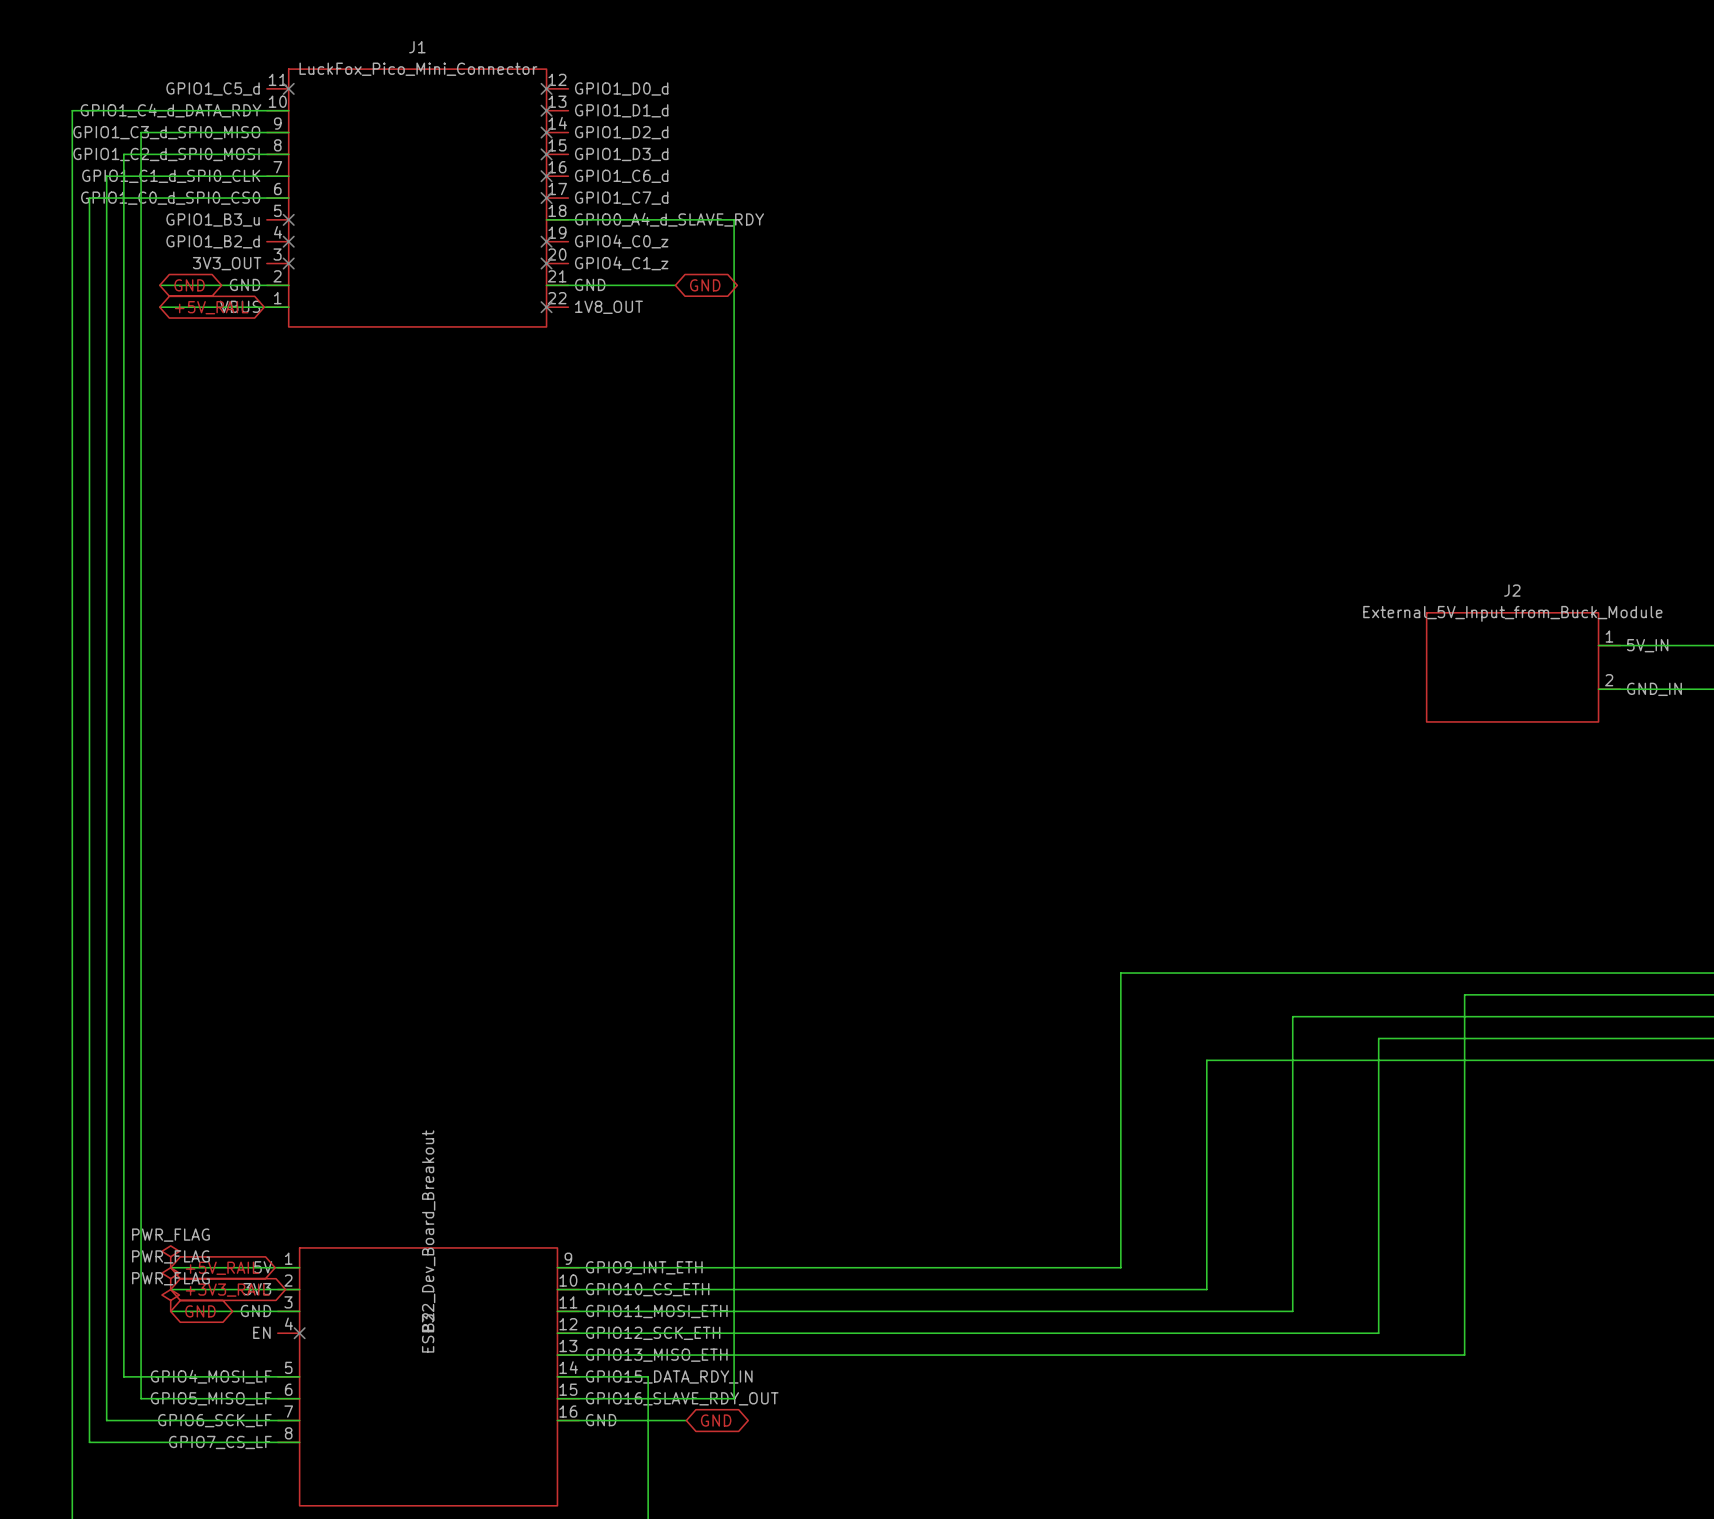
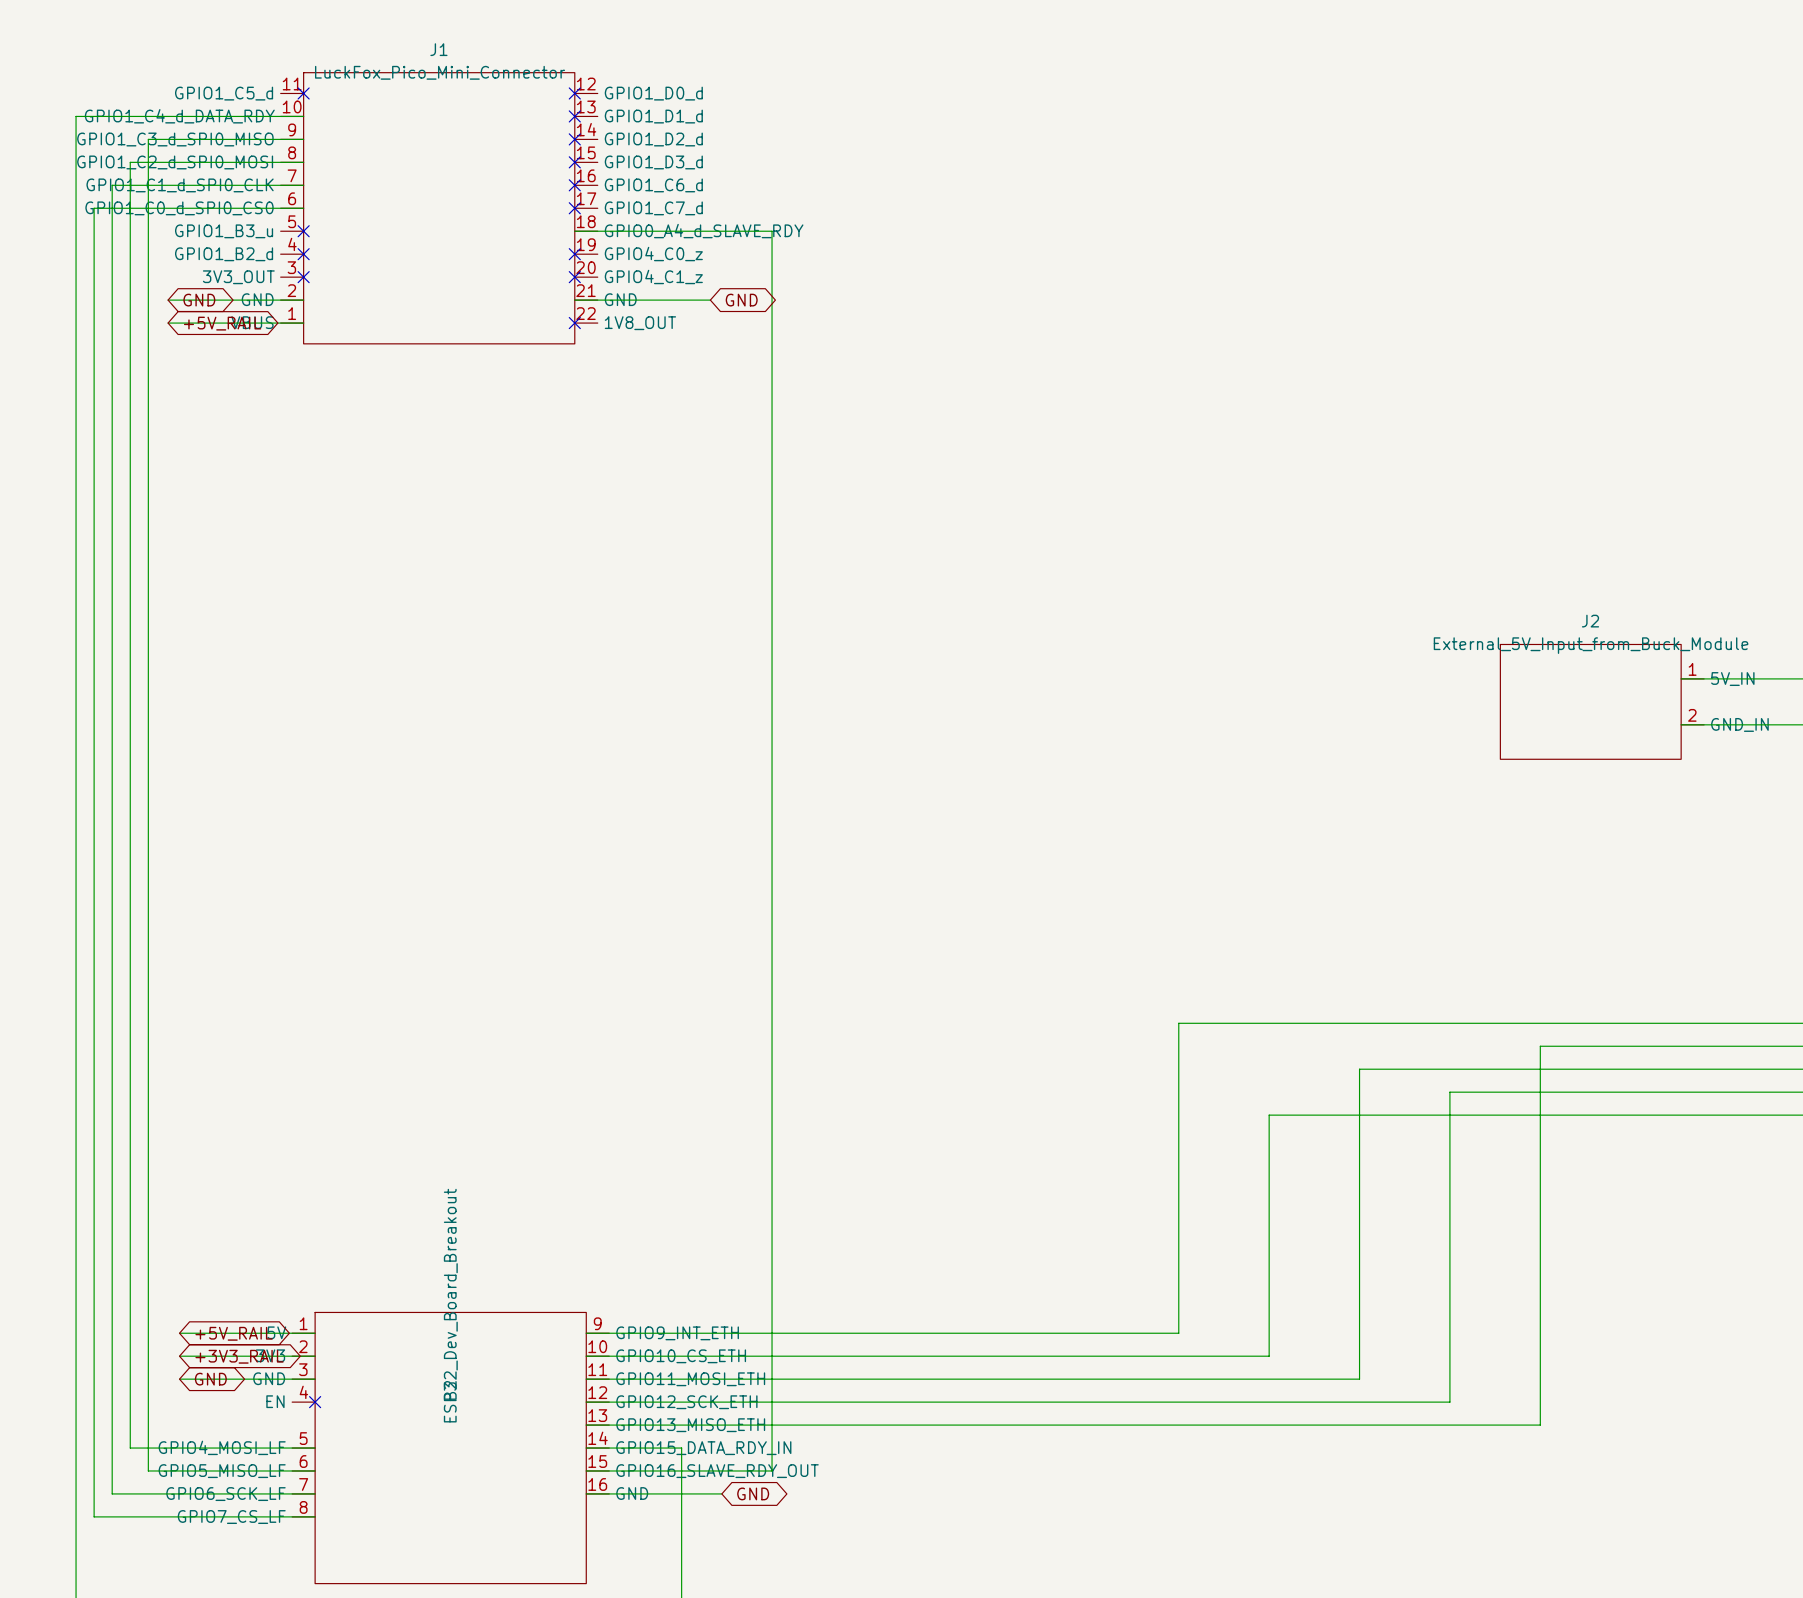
power symbol: PWR_FLAG (170, 1256) -> none
power symbol: PWR_FLAG (170, 1278) -> none
power symbol: PWR_FLAG (170, 1300) -> none

